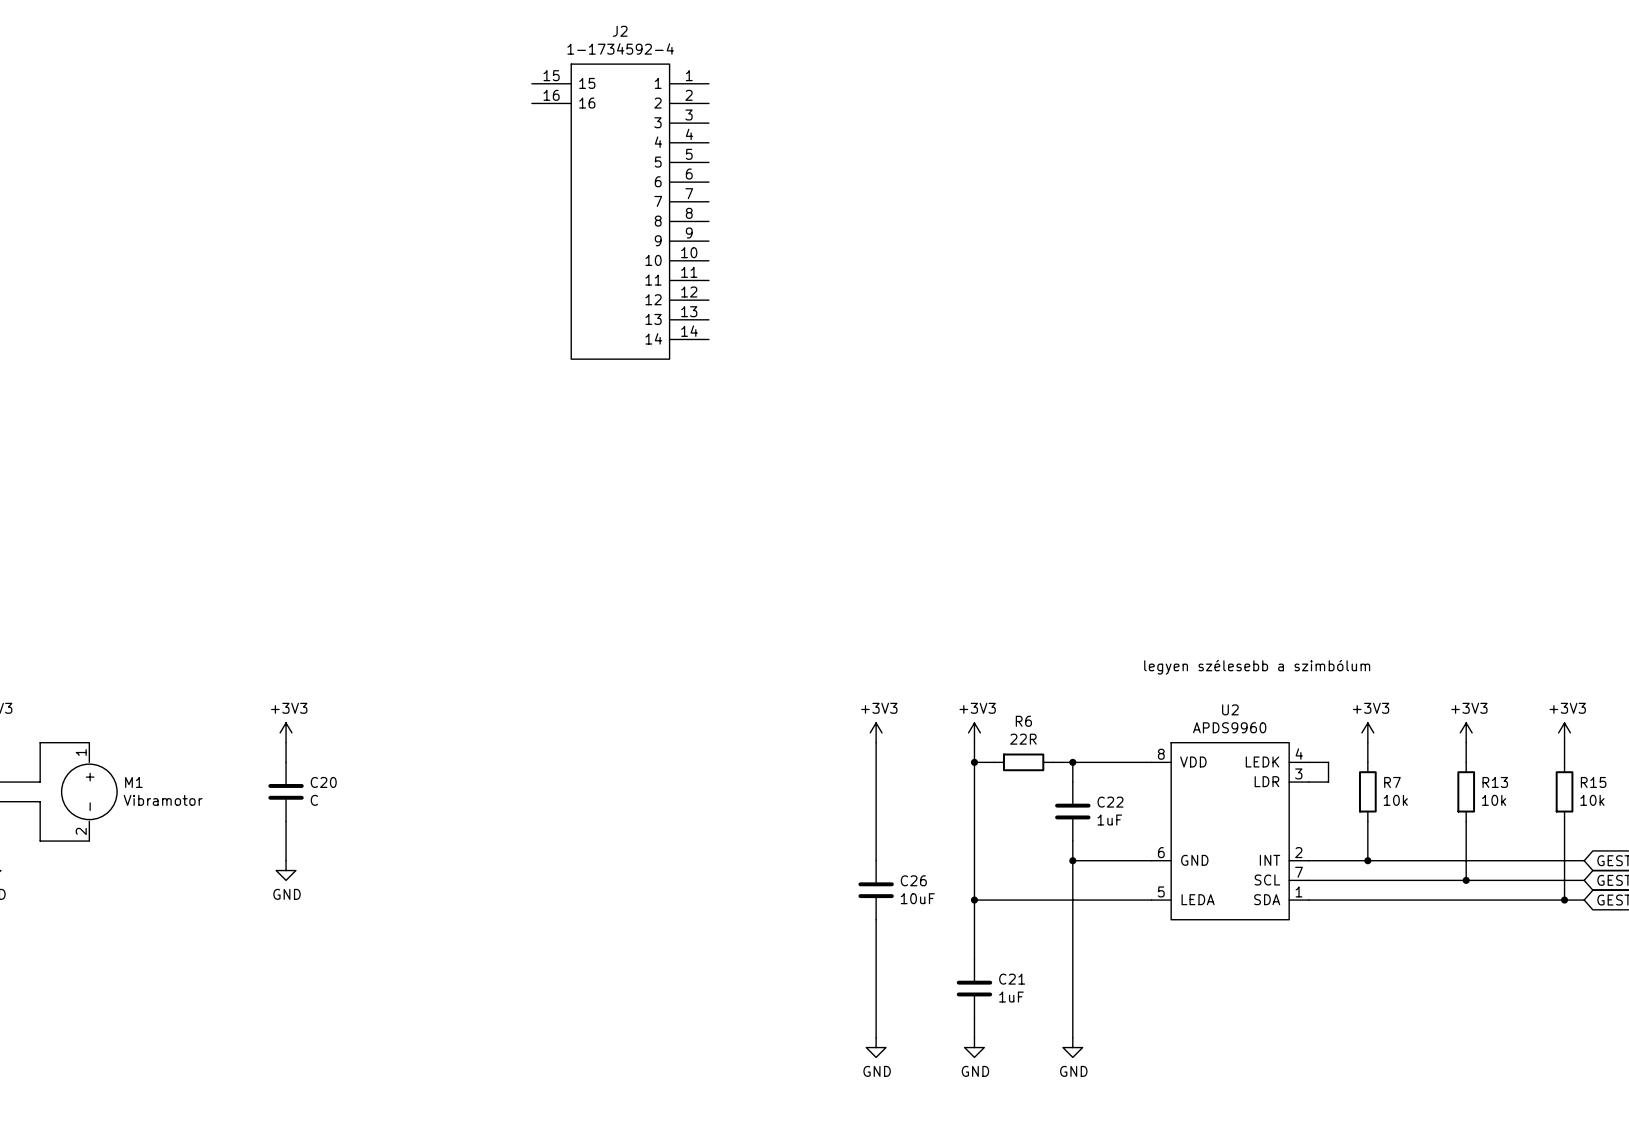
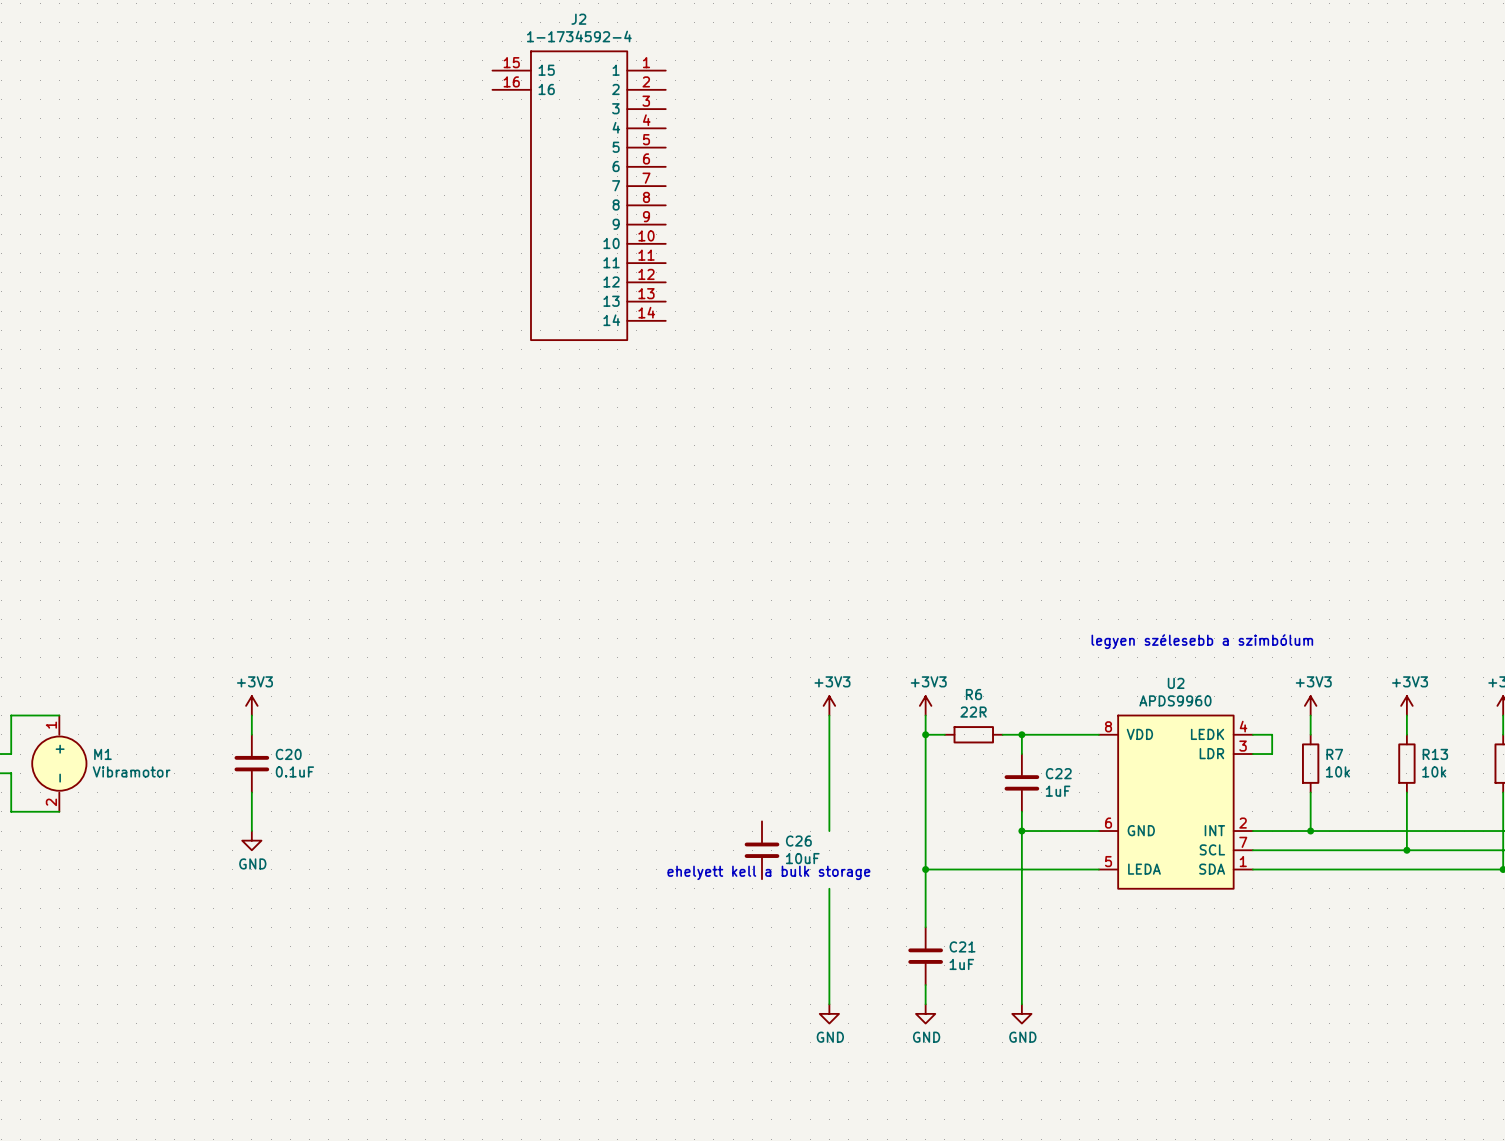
C20 value: C (314, 800) -> 0.1uF (294, 771)
C26 position: (876, 890) -> (762, 850)
text: none -> ehelyett kell a bulk storage (768, 872)

